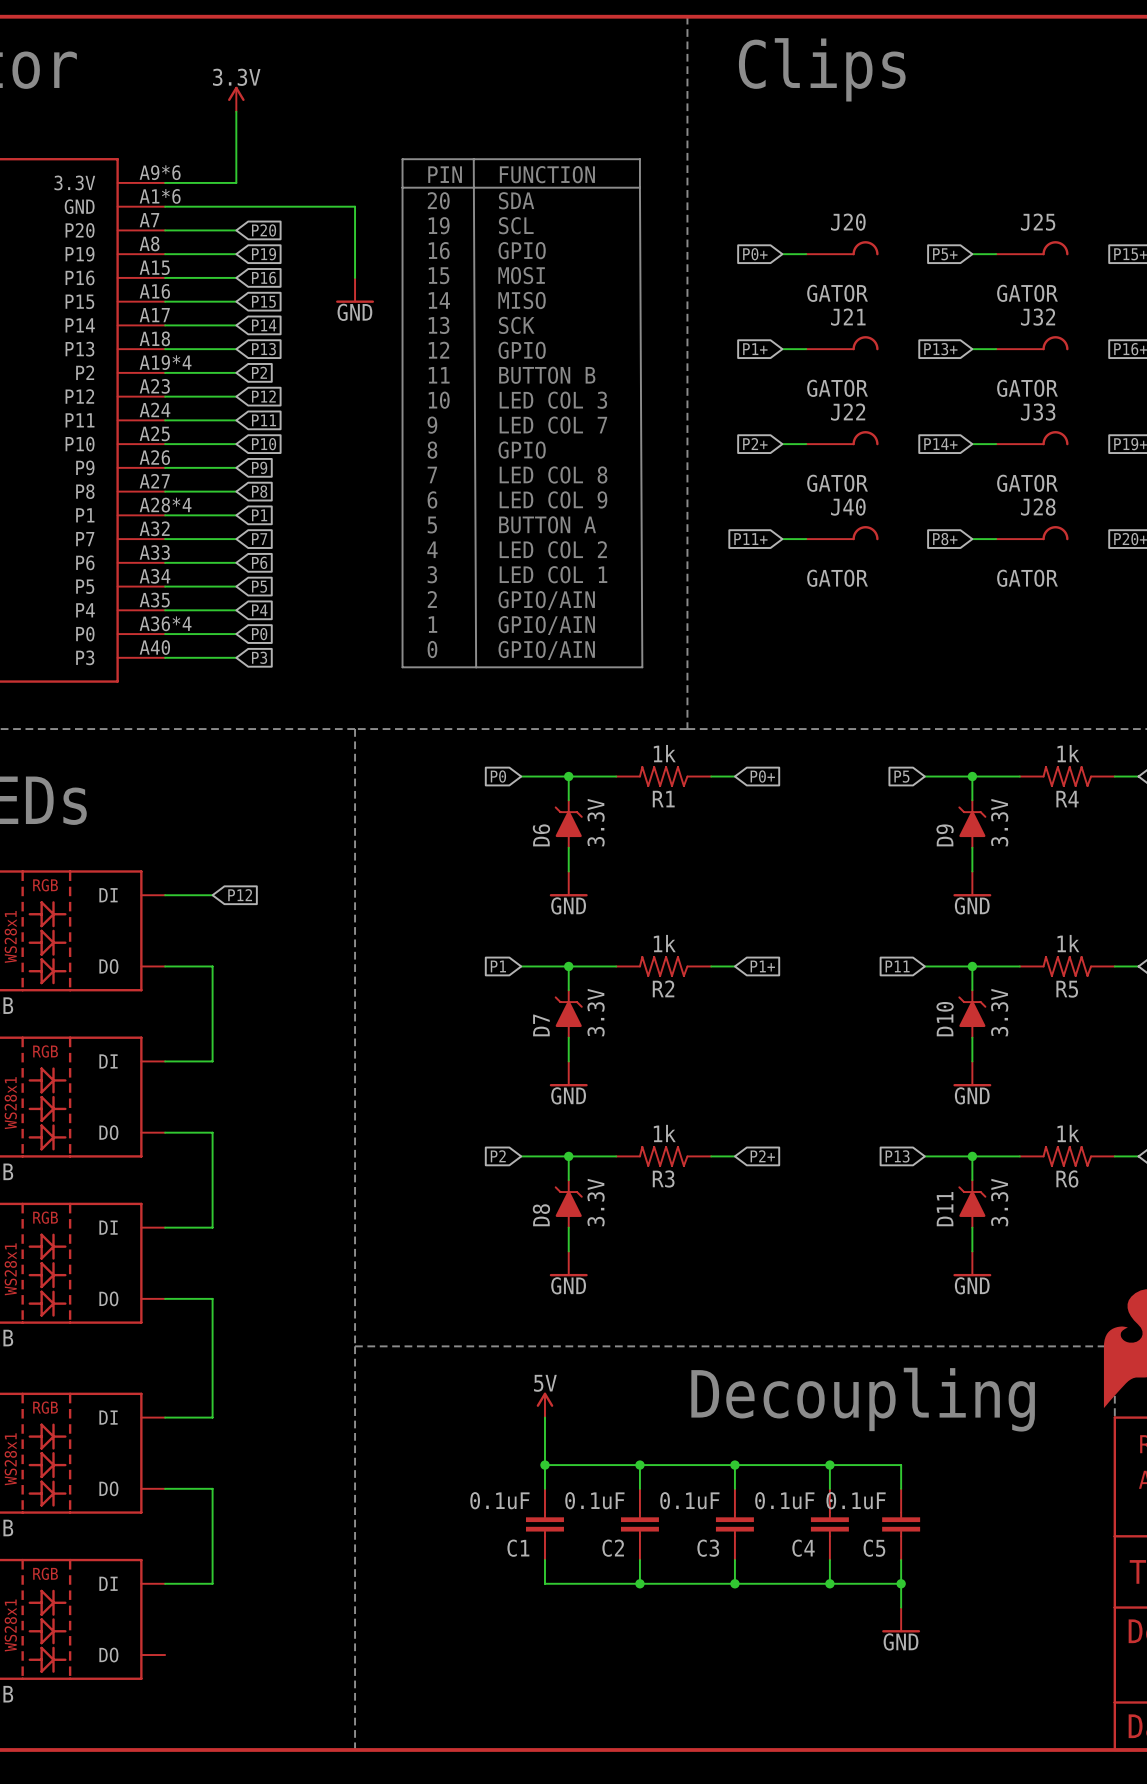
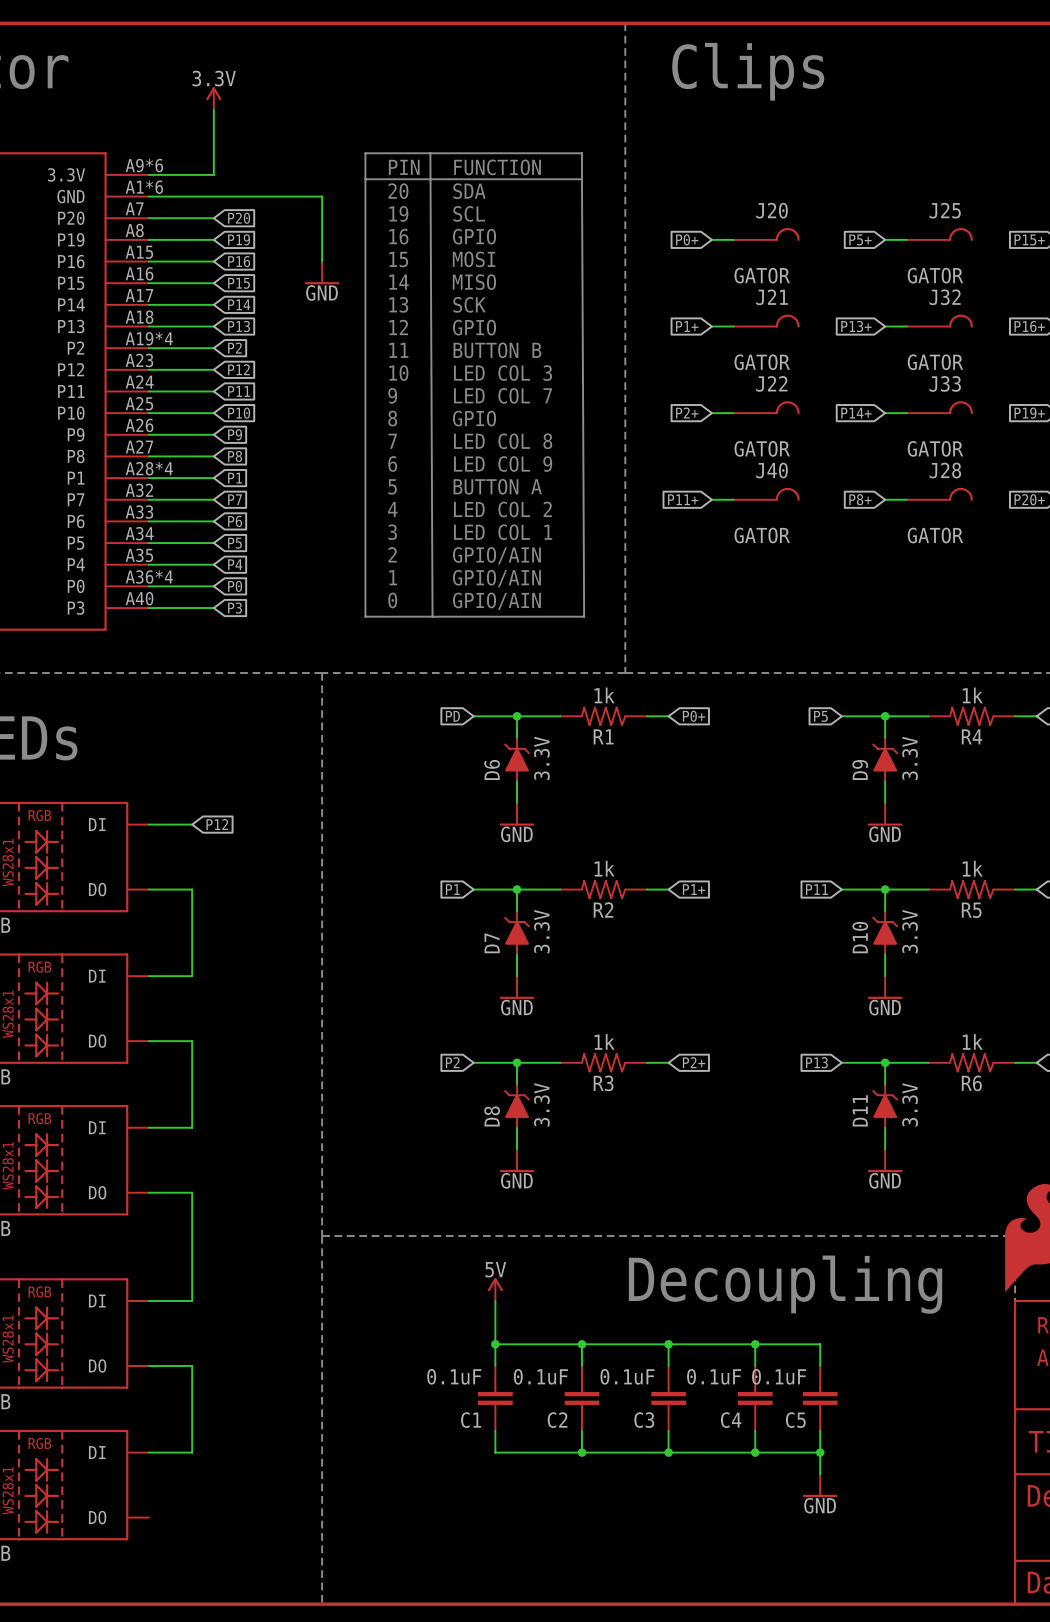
global label: P0 (498, 776) -> PD (452, 716)

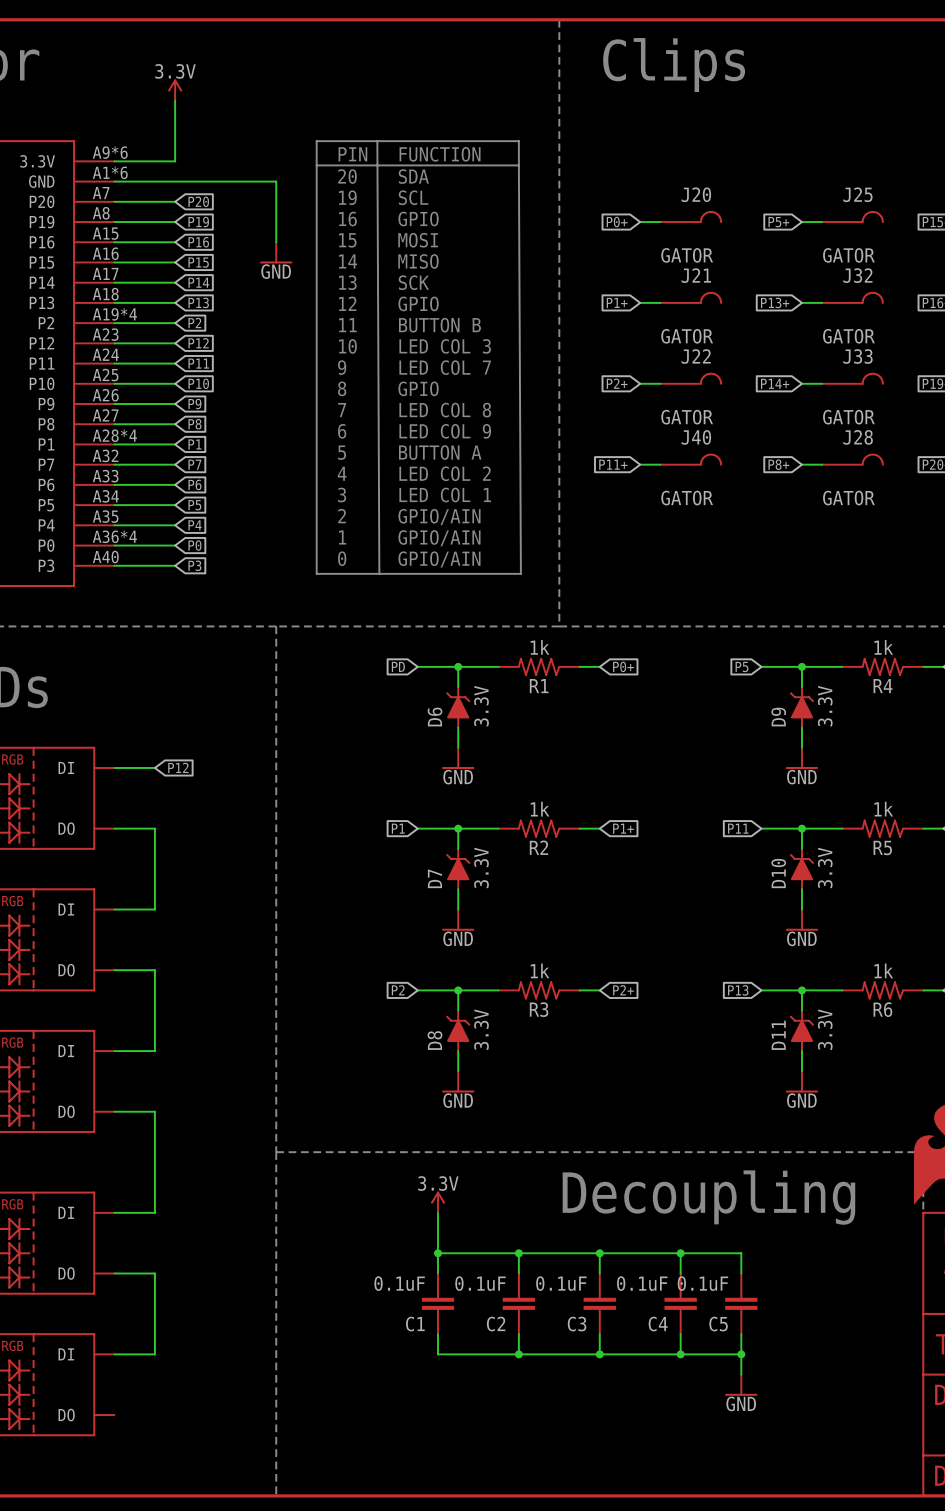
power symbol: 5V (495, 1289) -> 3.3V (438, 1202)

